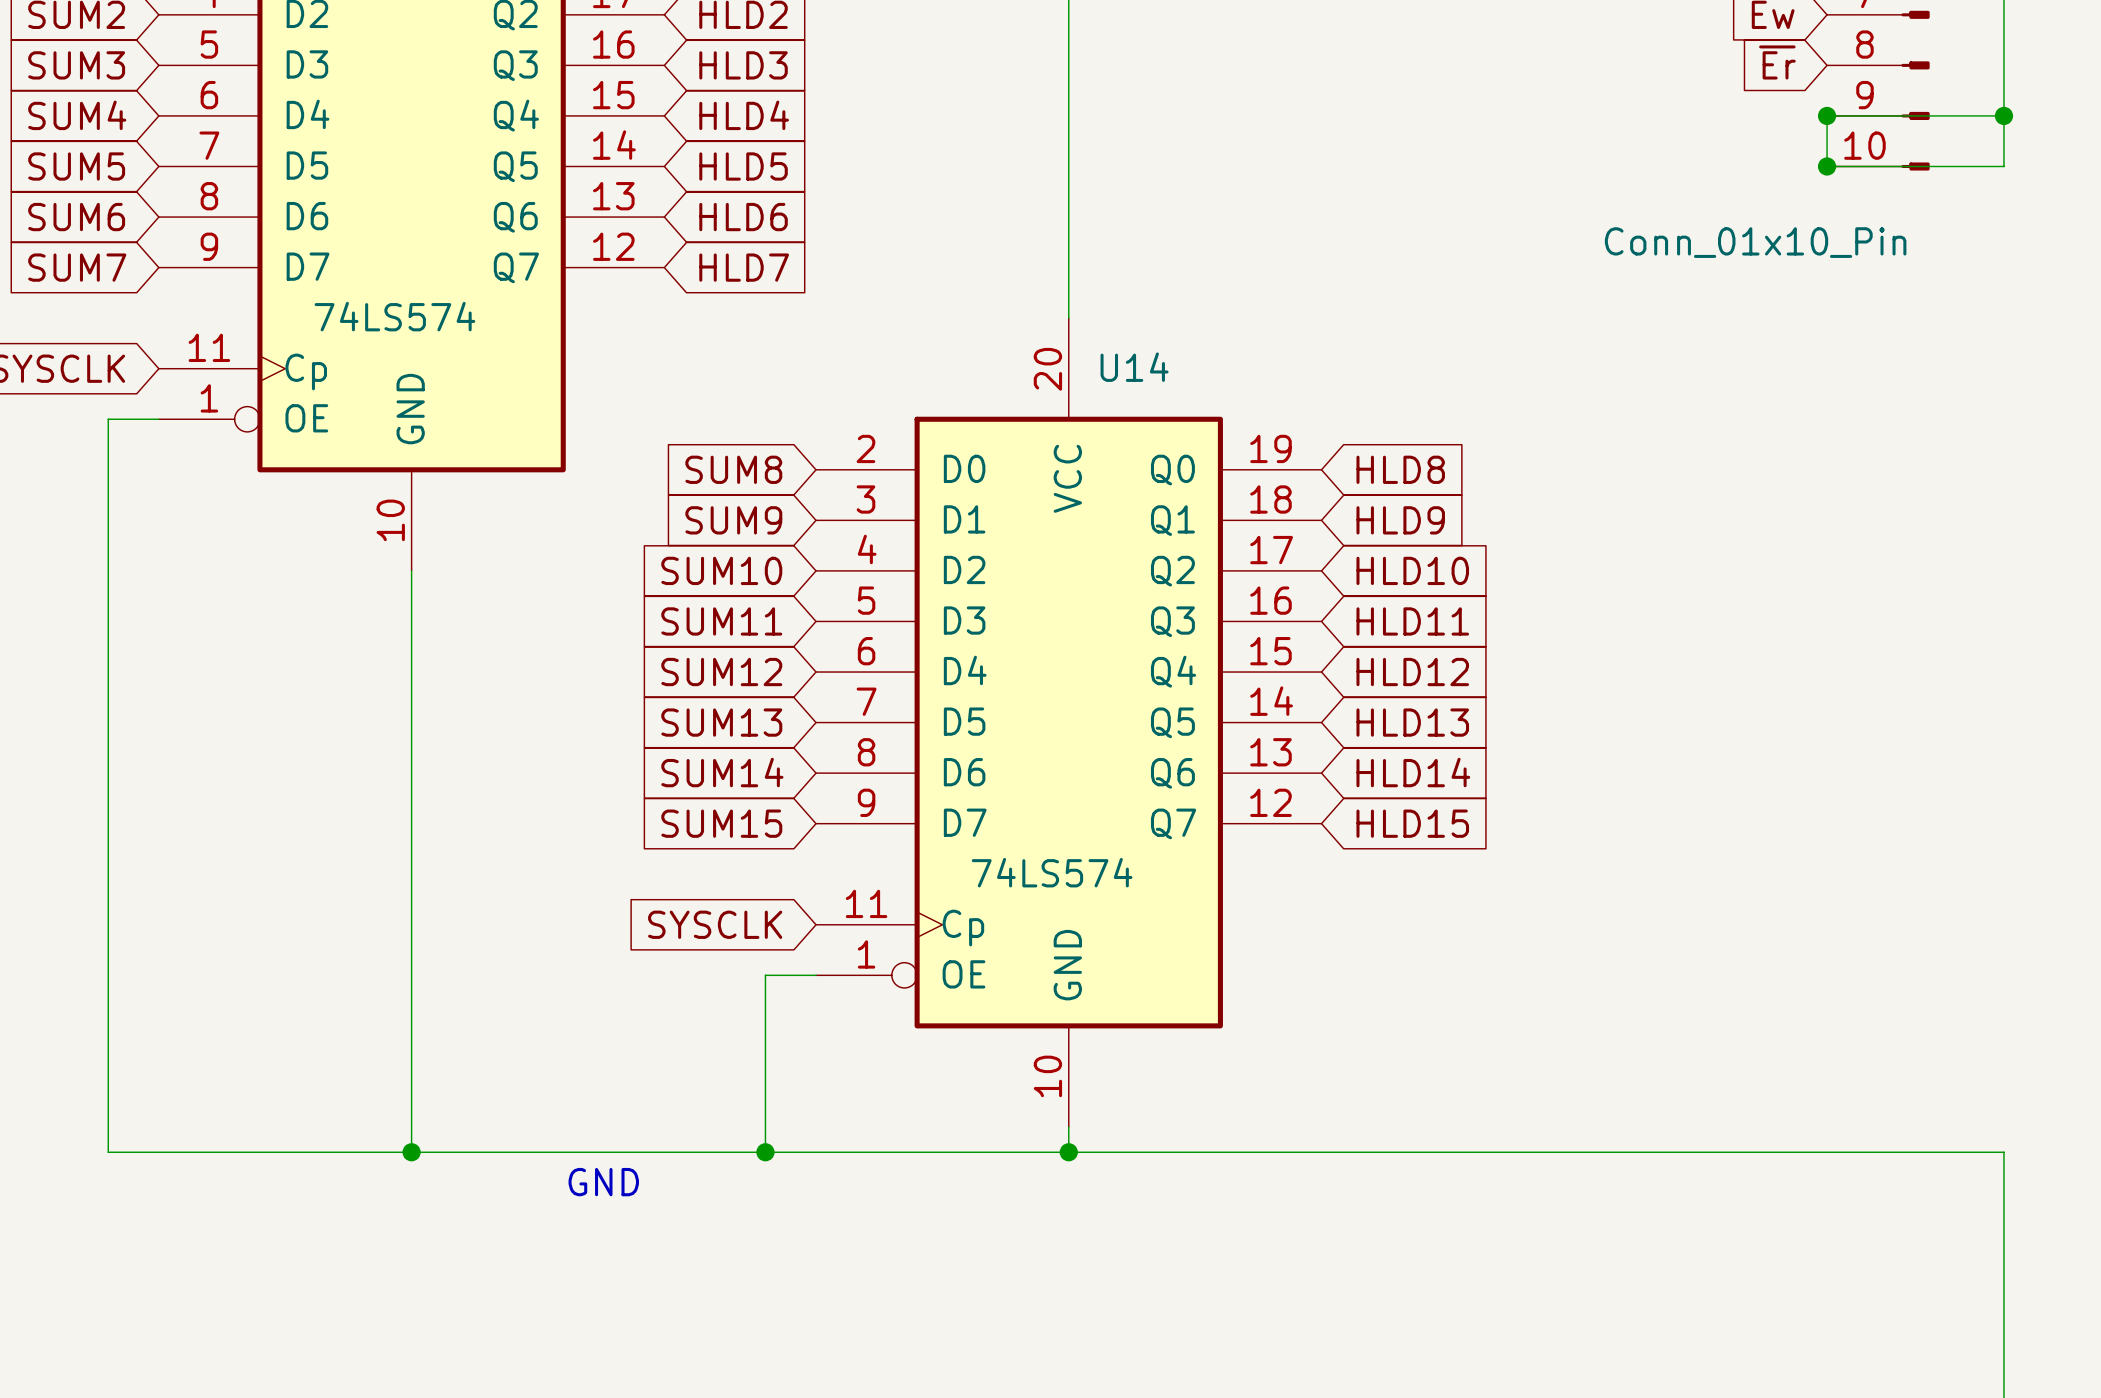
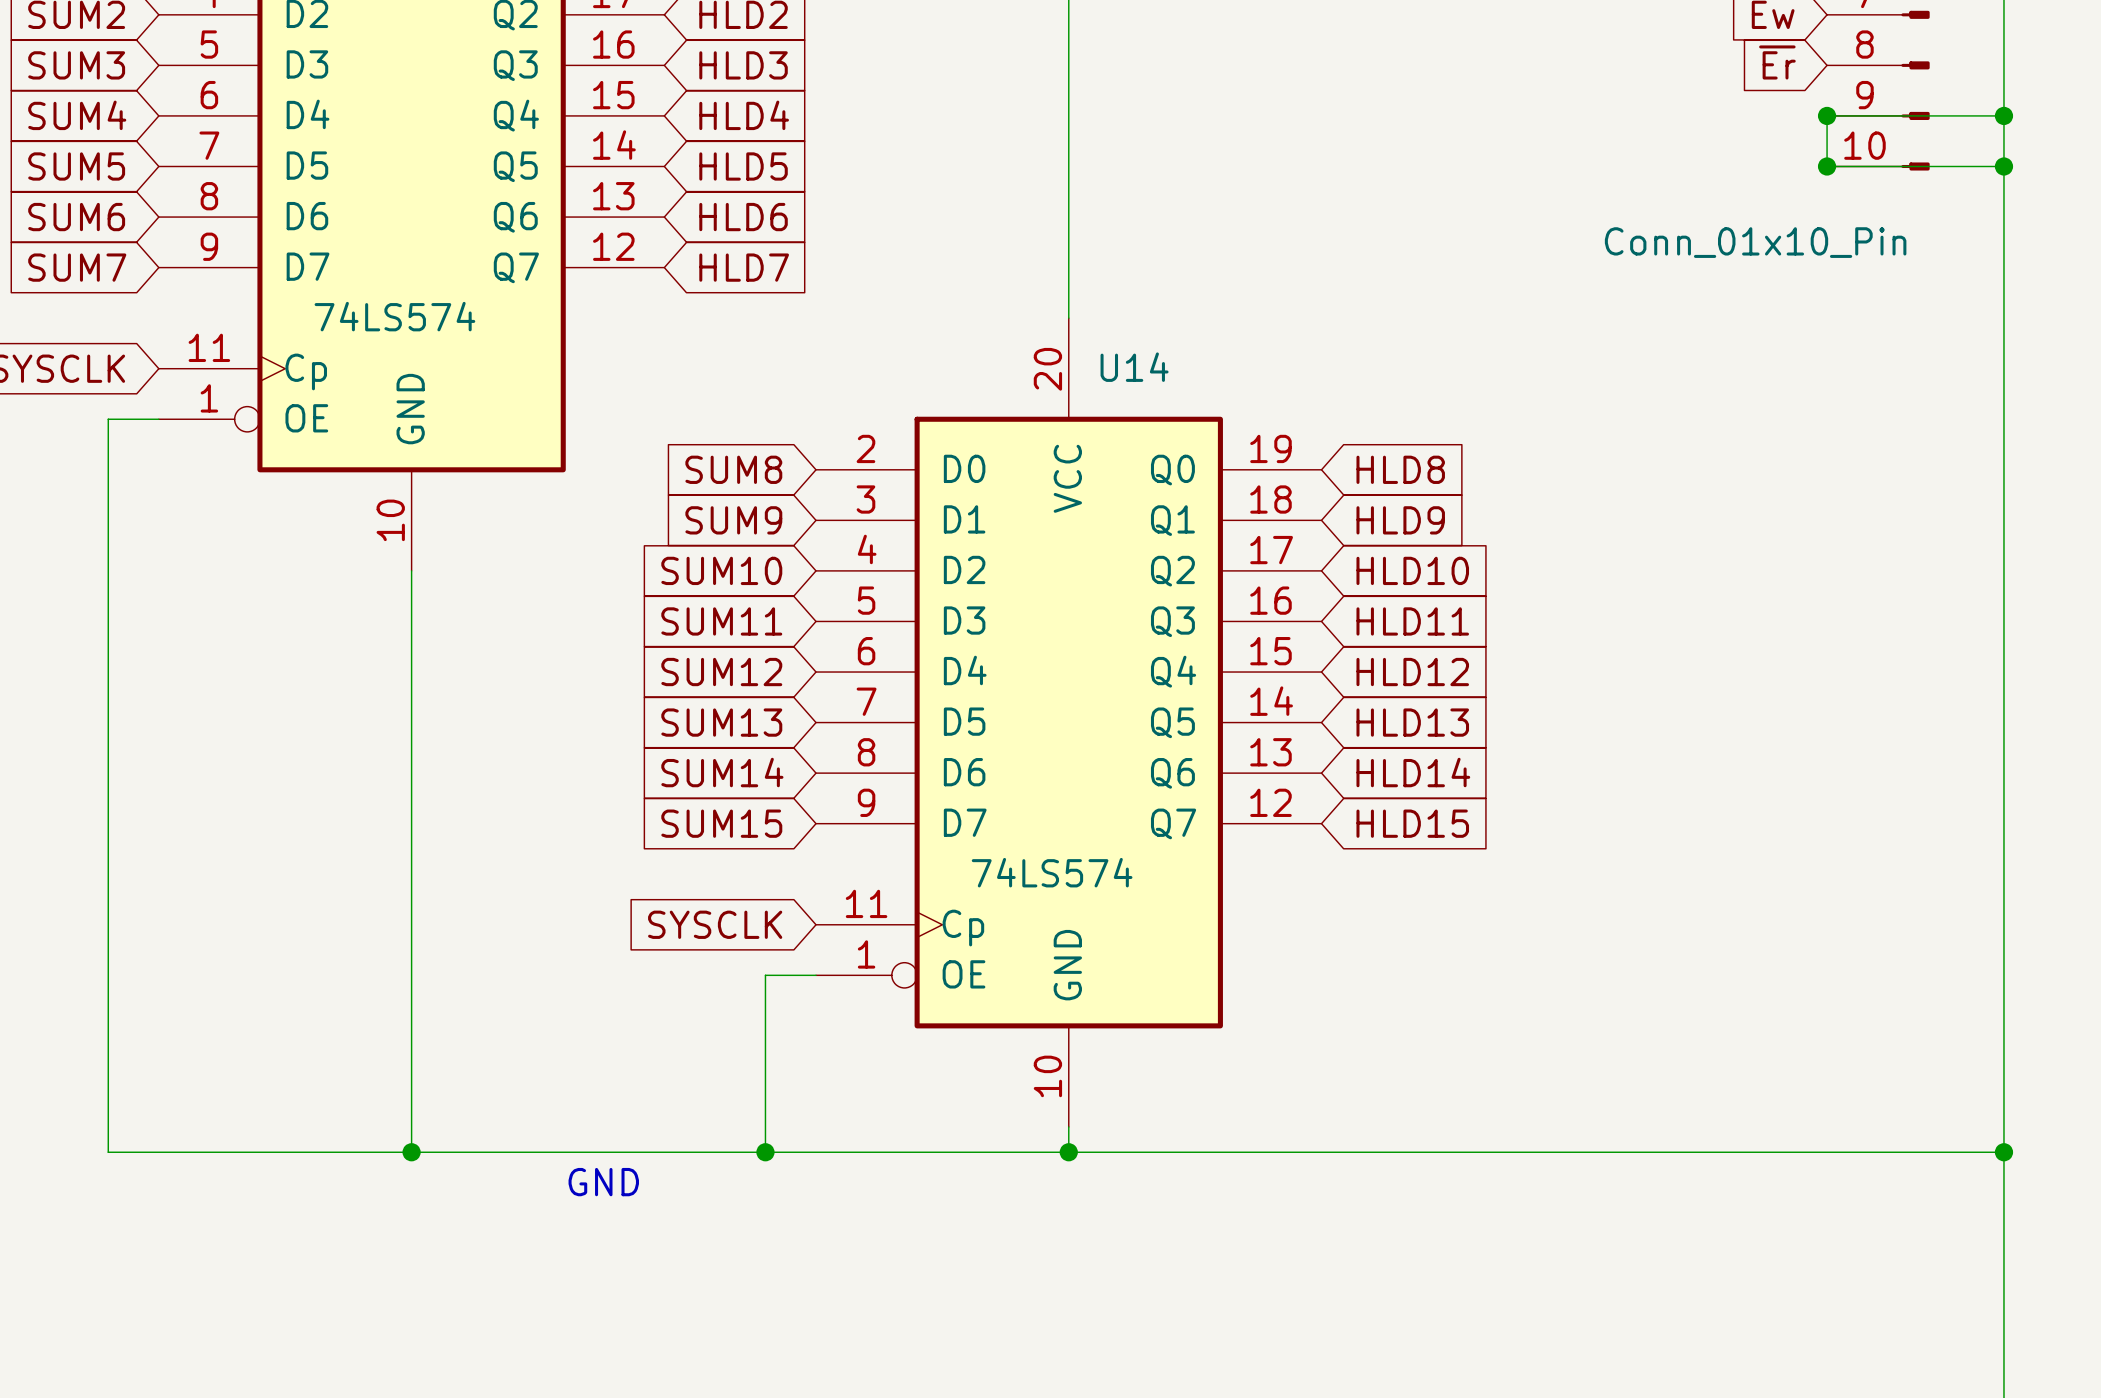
wire: none -> (2003, 166) (2003, 1152)
junction: none -> (2003, 166)
junction: none -> (2003, 1152)

